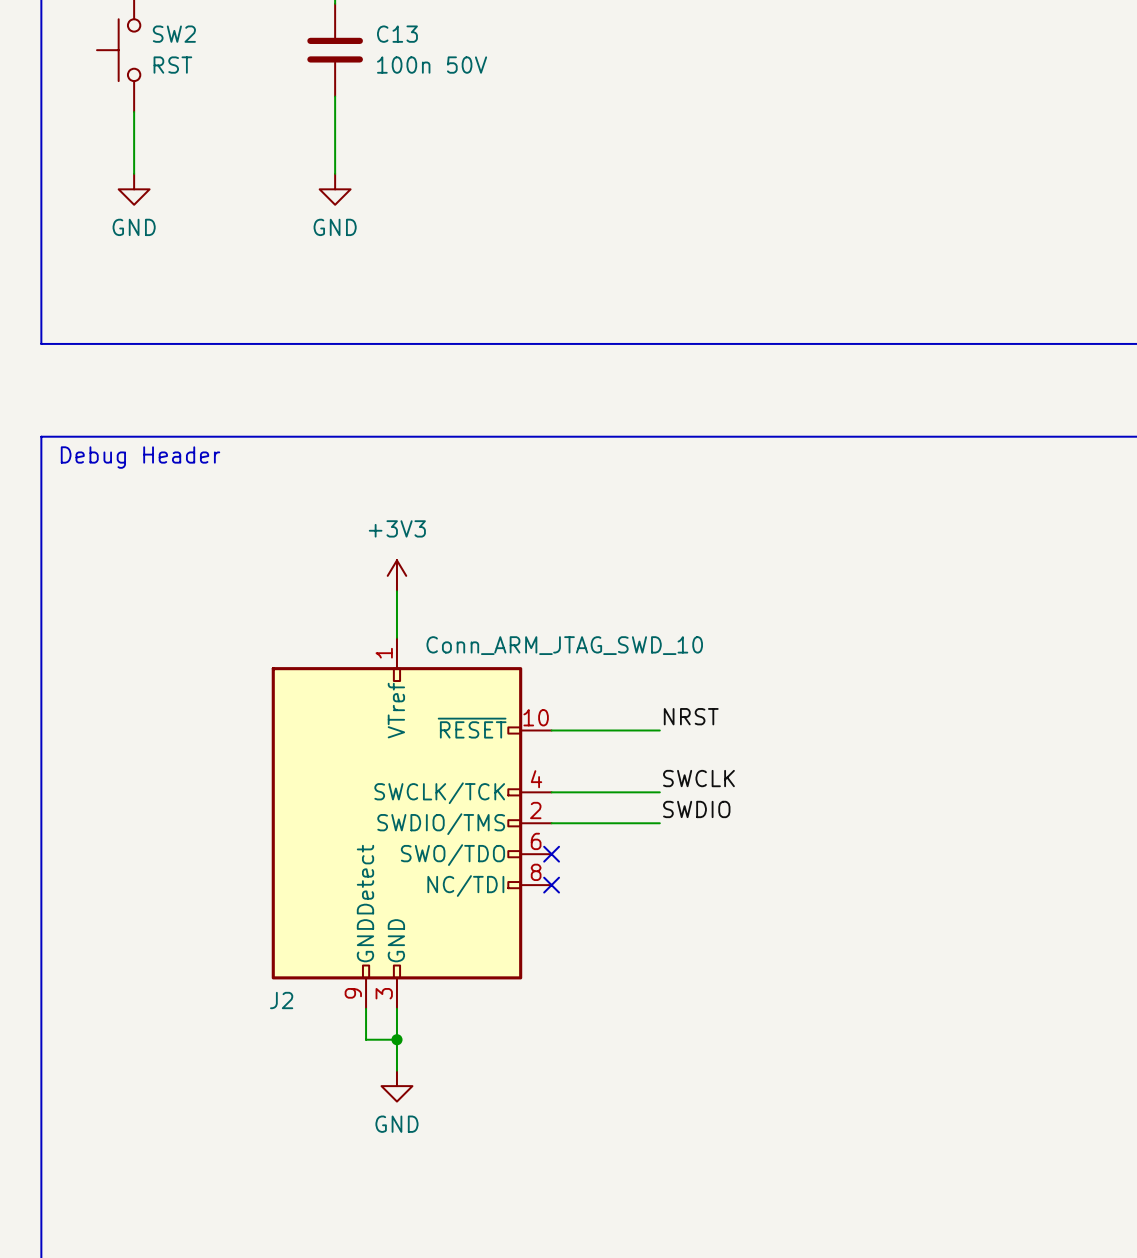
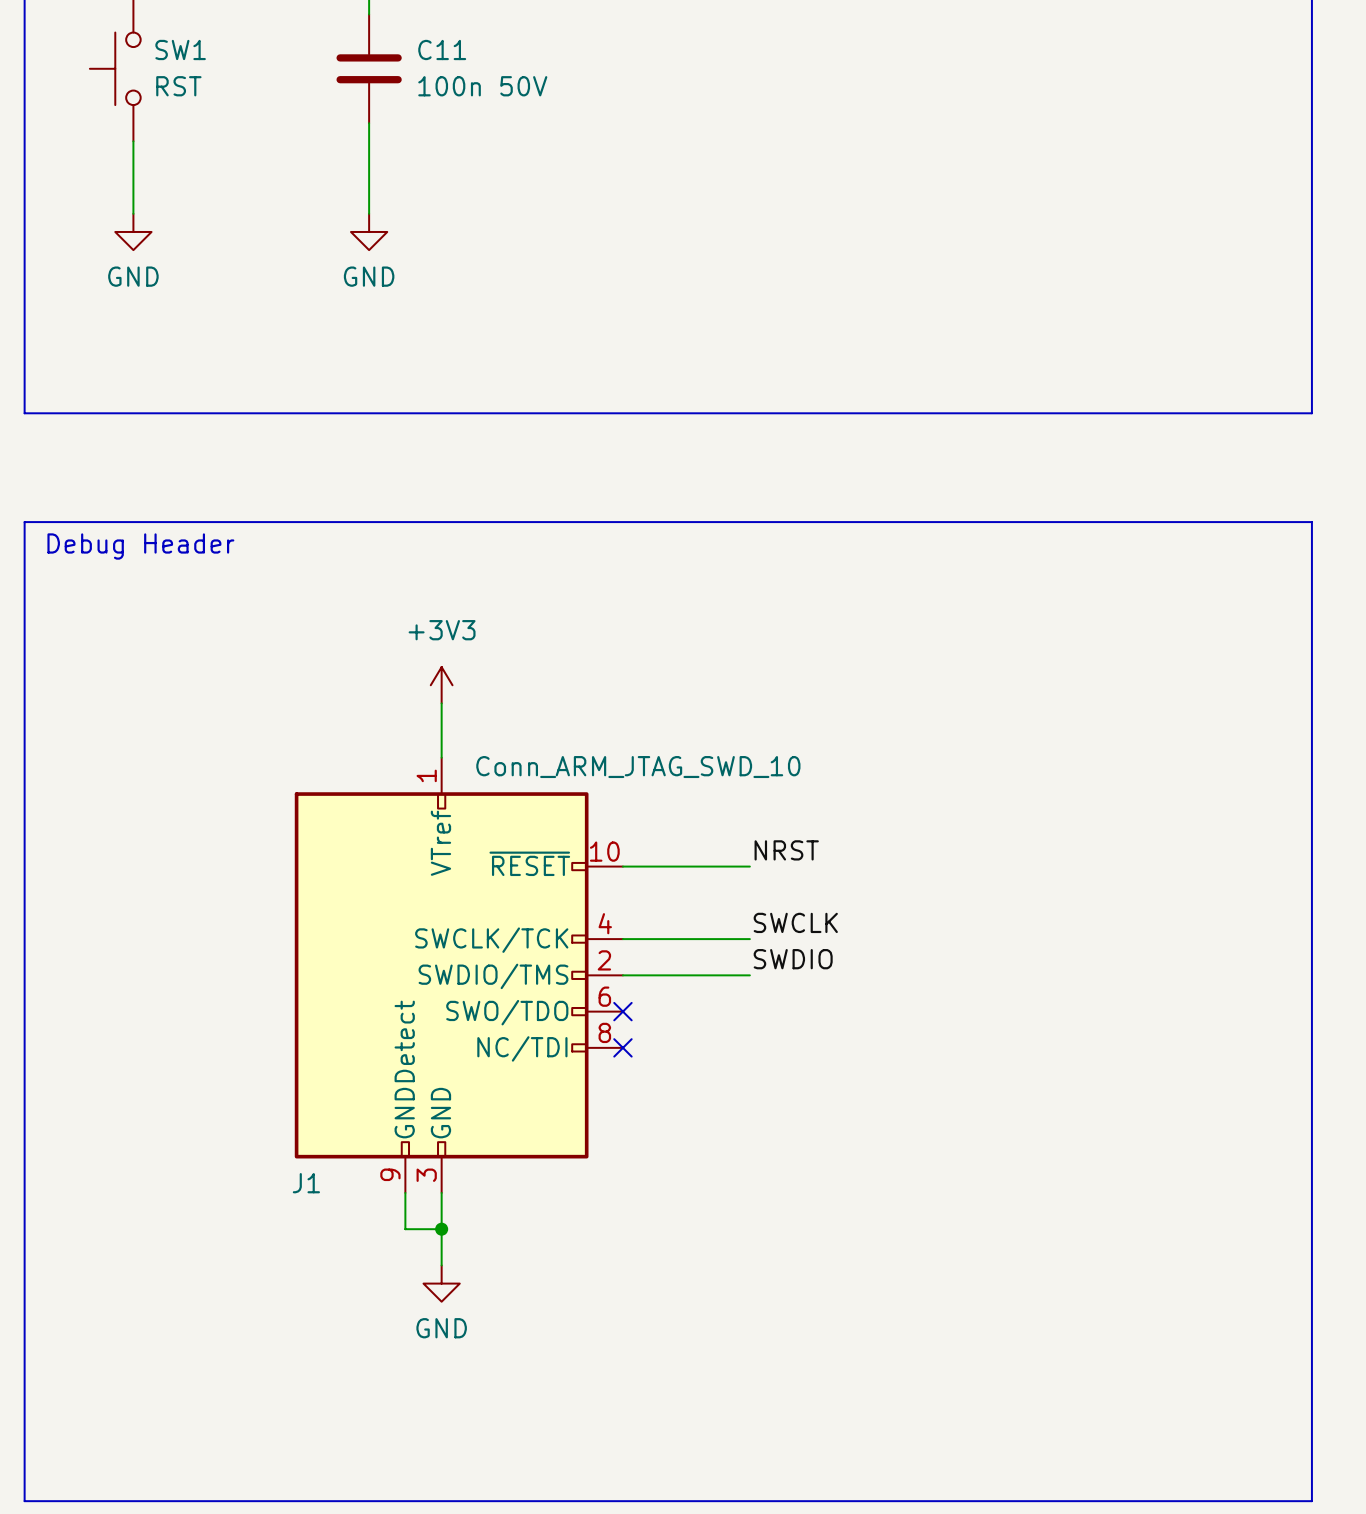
SW2 name: SW2 (174, 34) -> SW1 (180, 49)
C13 name: C13 (397, 34) -> C11 (442, 49)
J2 name: J2 (281, 1000) -> J1 (306, 1183)

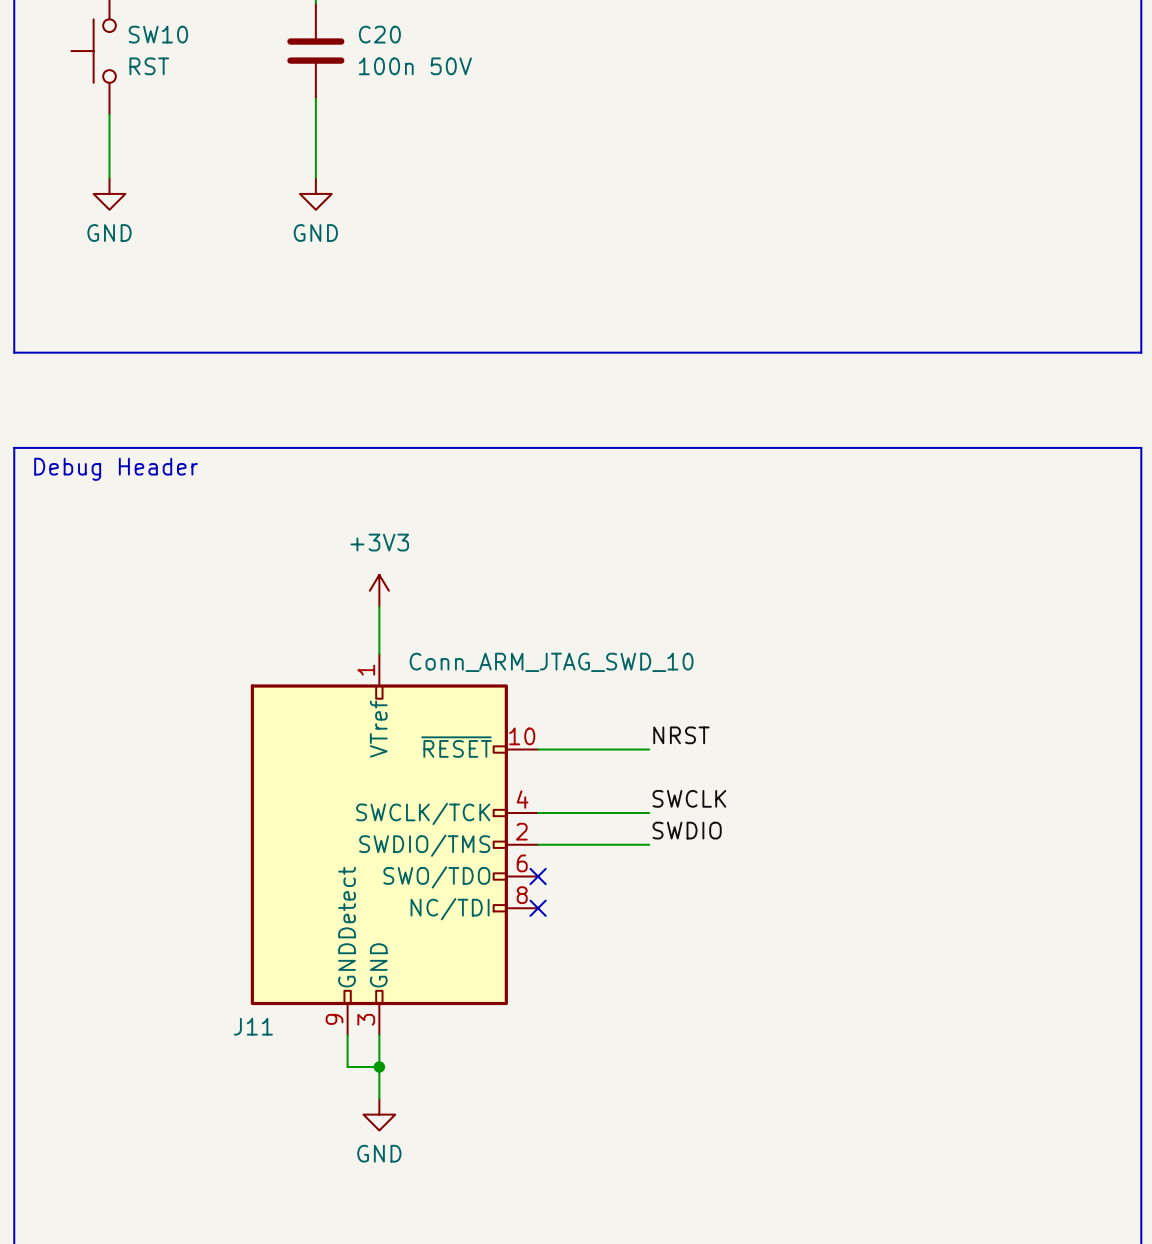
SW1 name: SW1 (180, 49) -> SW10 (158, 34)
C11 name: C11 (442, 49) -> C20 (379, 34)
J1 name: J1 (306, 1183) -> J11 (253, 1026)

